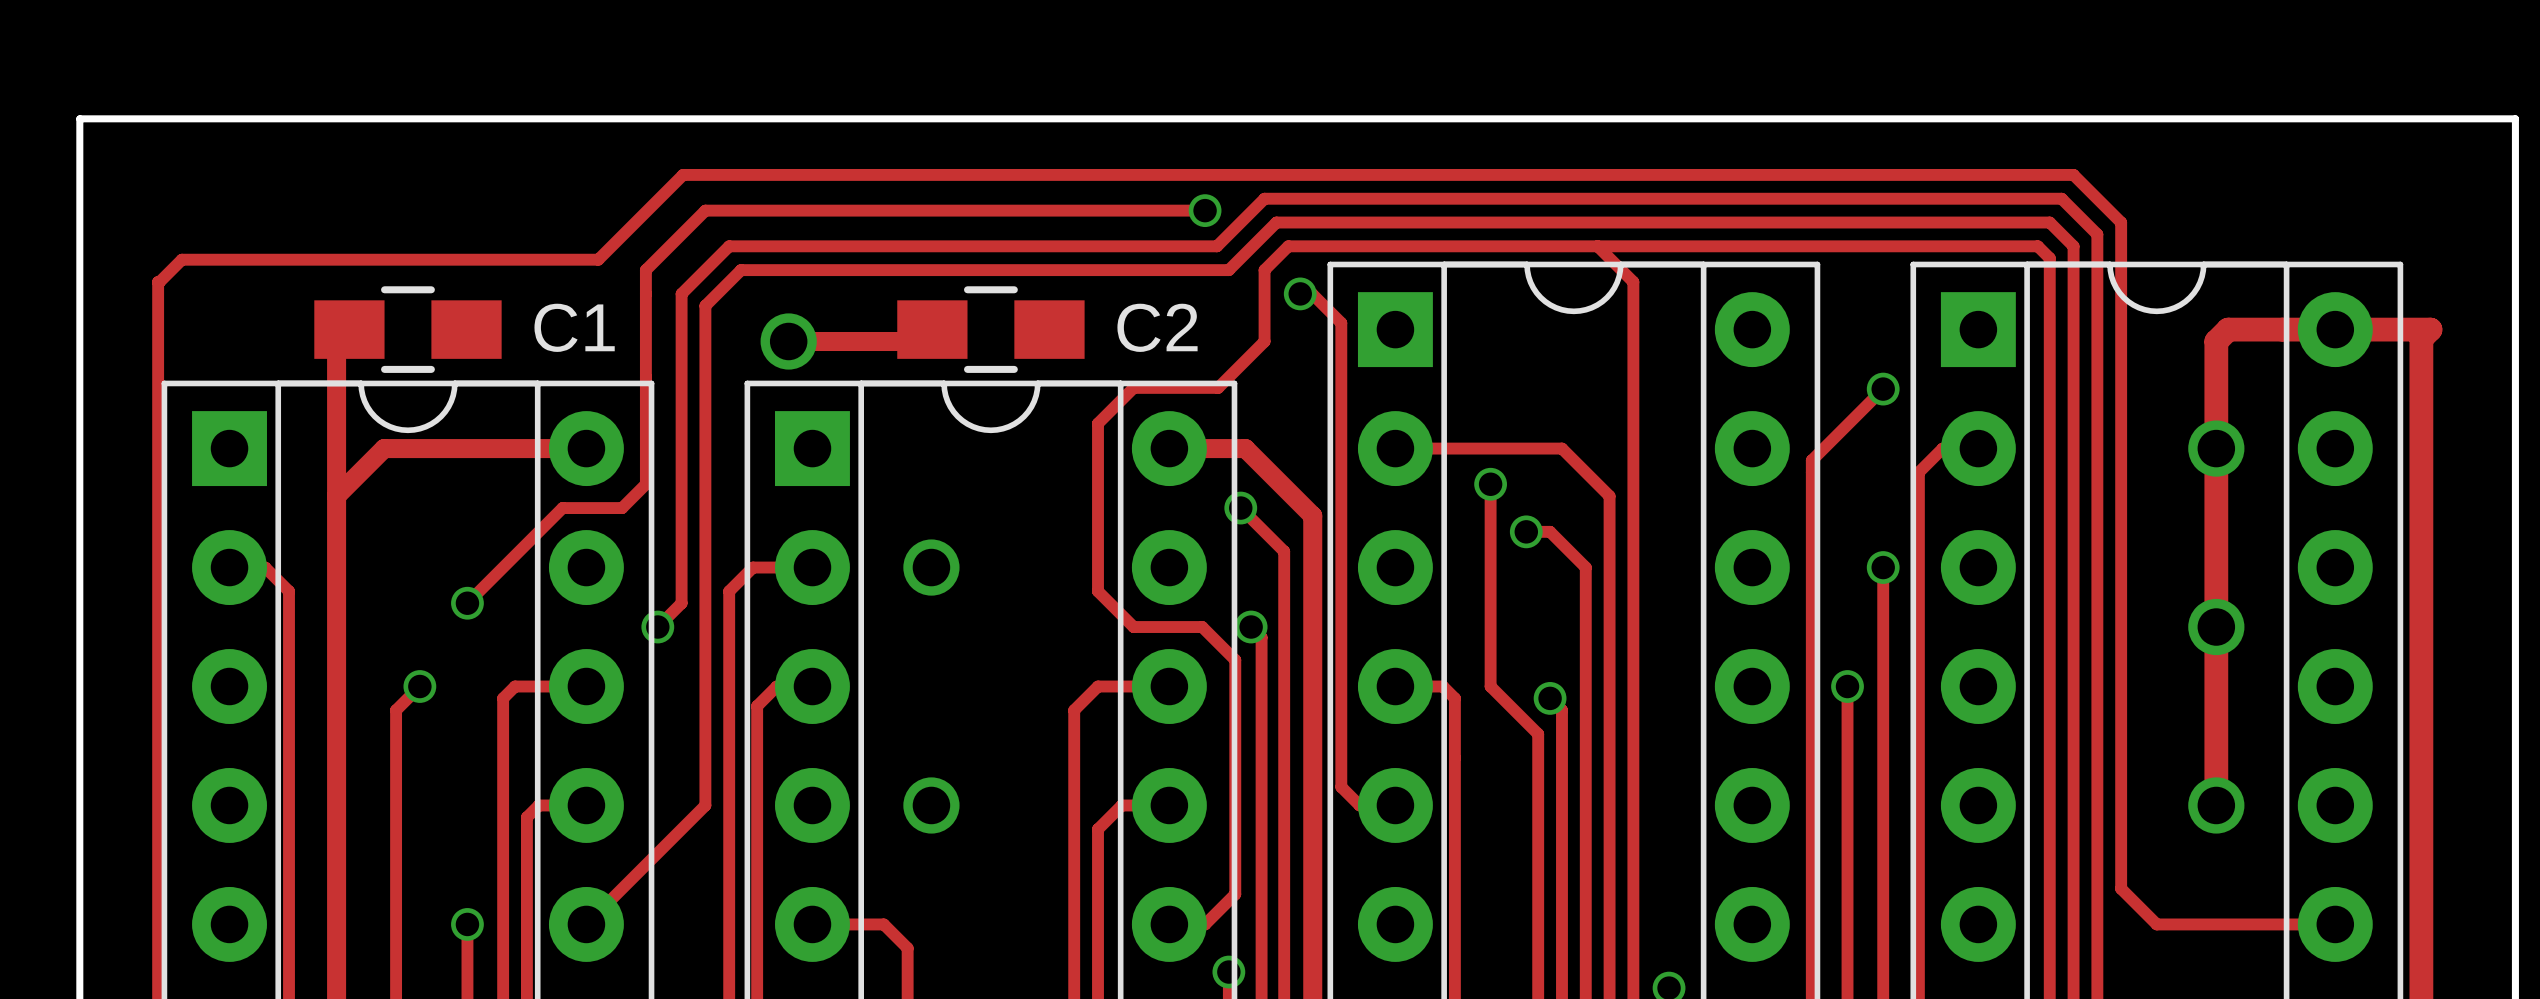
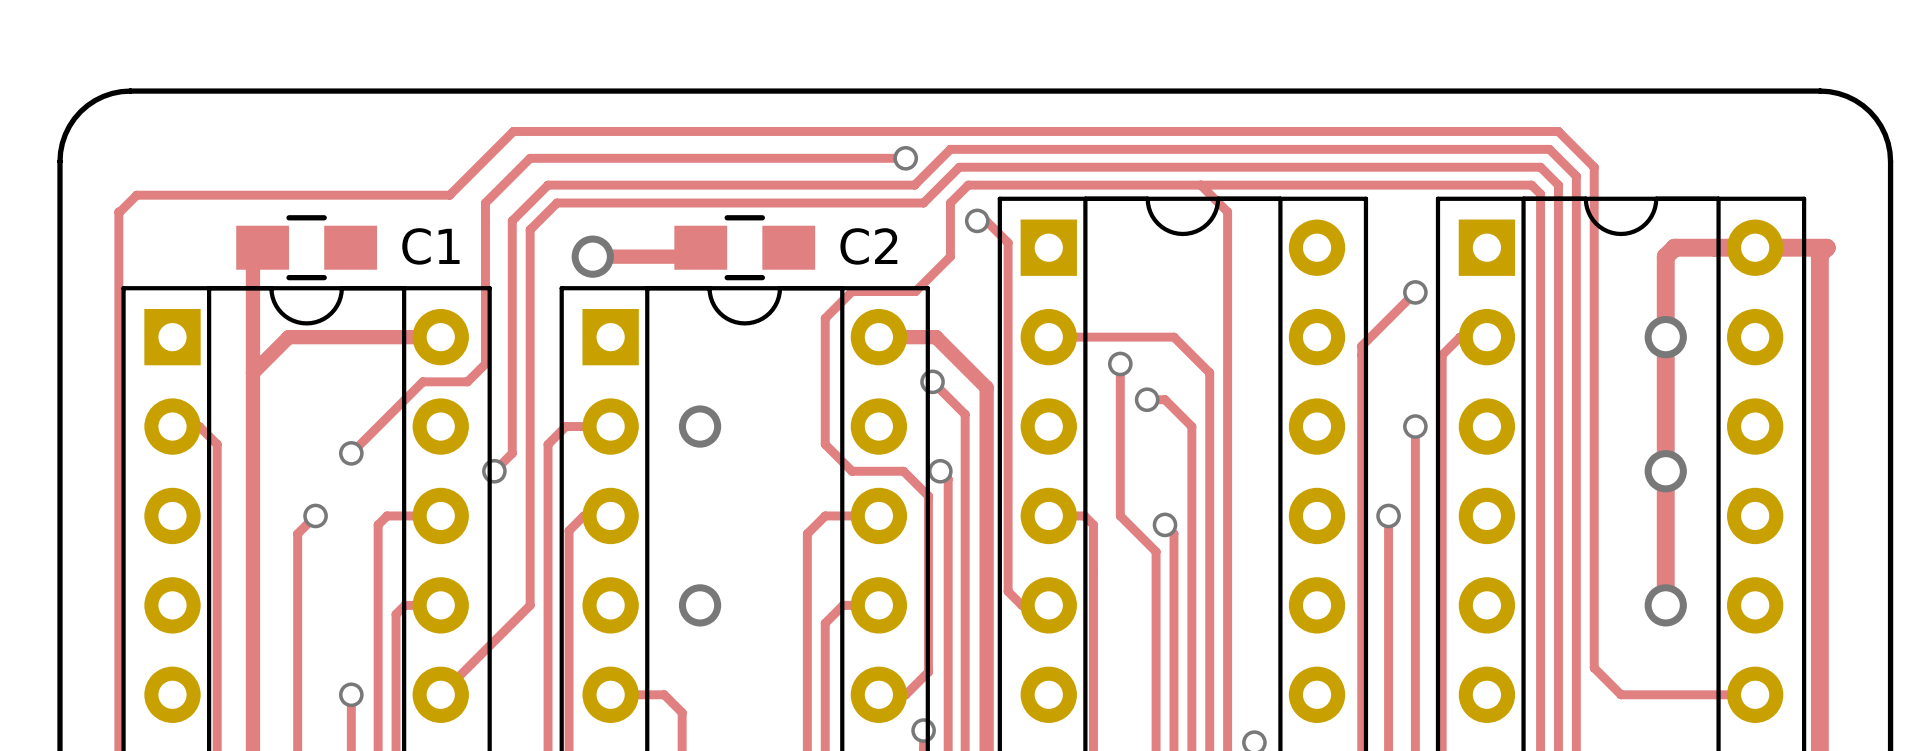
board edge: (79, 214) (79, 118) (2515, 118) (2515, 214) -> (59, 161) (65, 134) (80, 111) (103, 96) (130, 91) (1820, 91) (1847, 96) (1869, 111) (1885, 134) (1890, 161)

